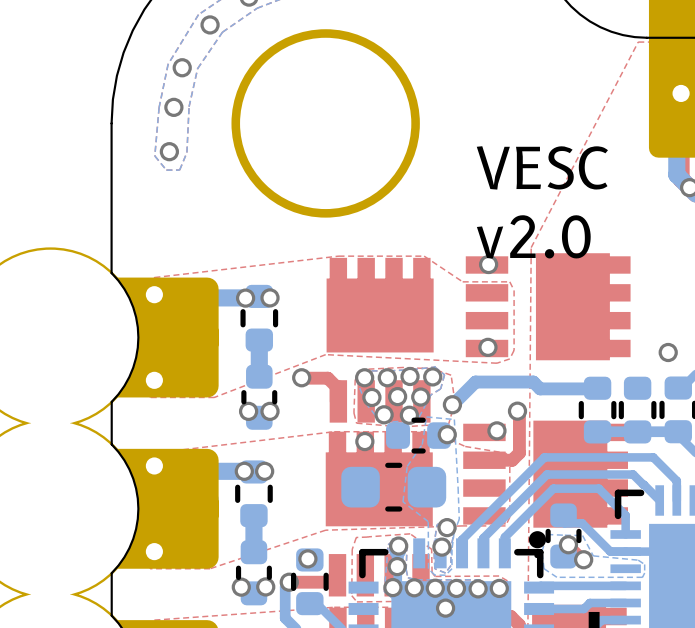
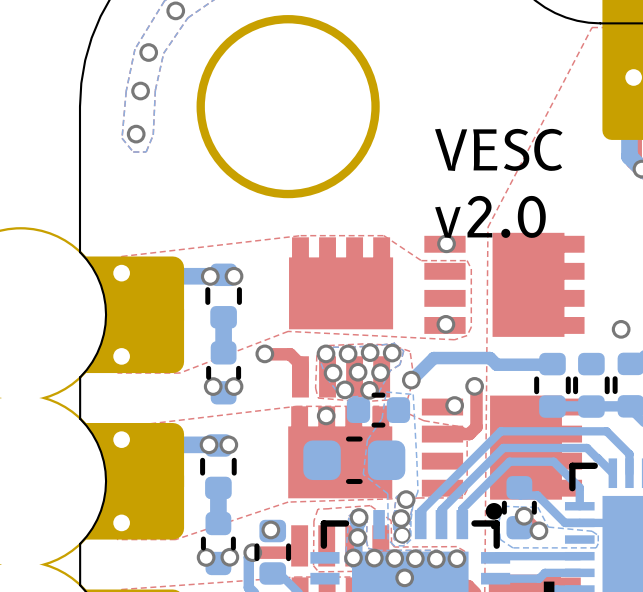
via: (447, 434) -> none
via: none -> (402, 535)

